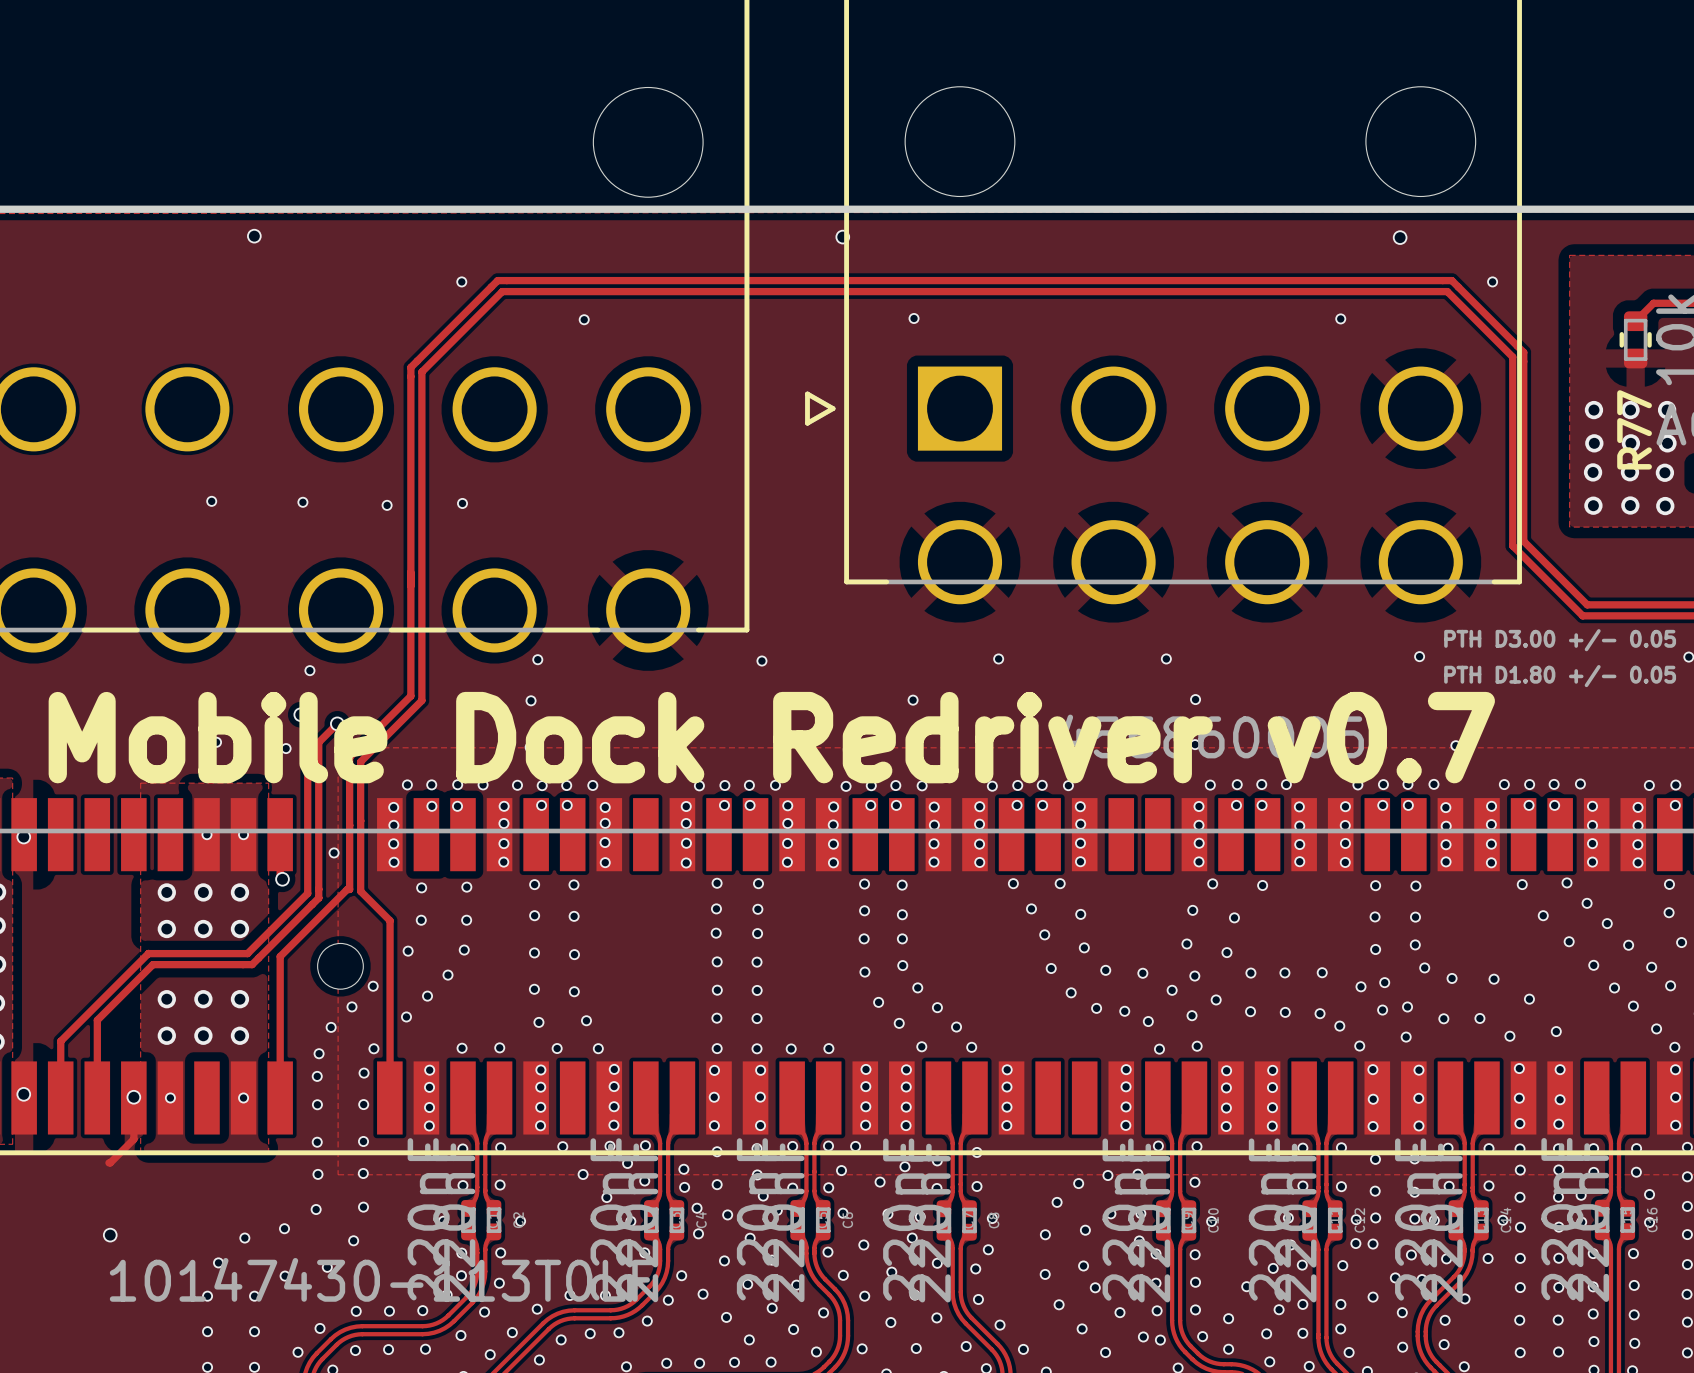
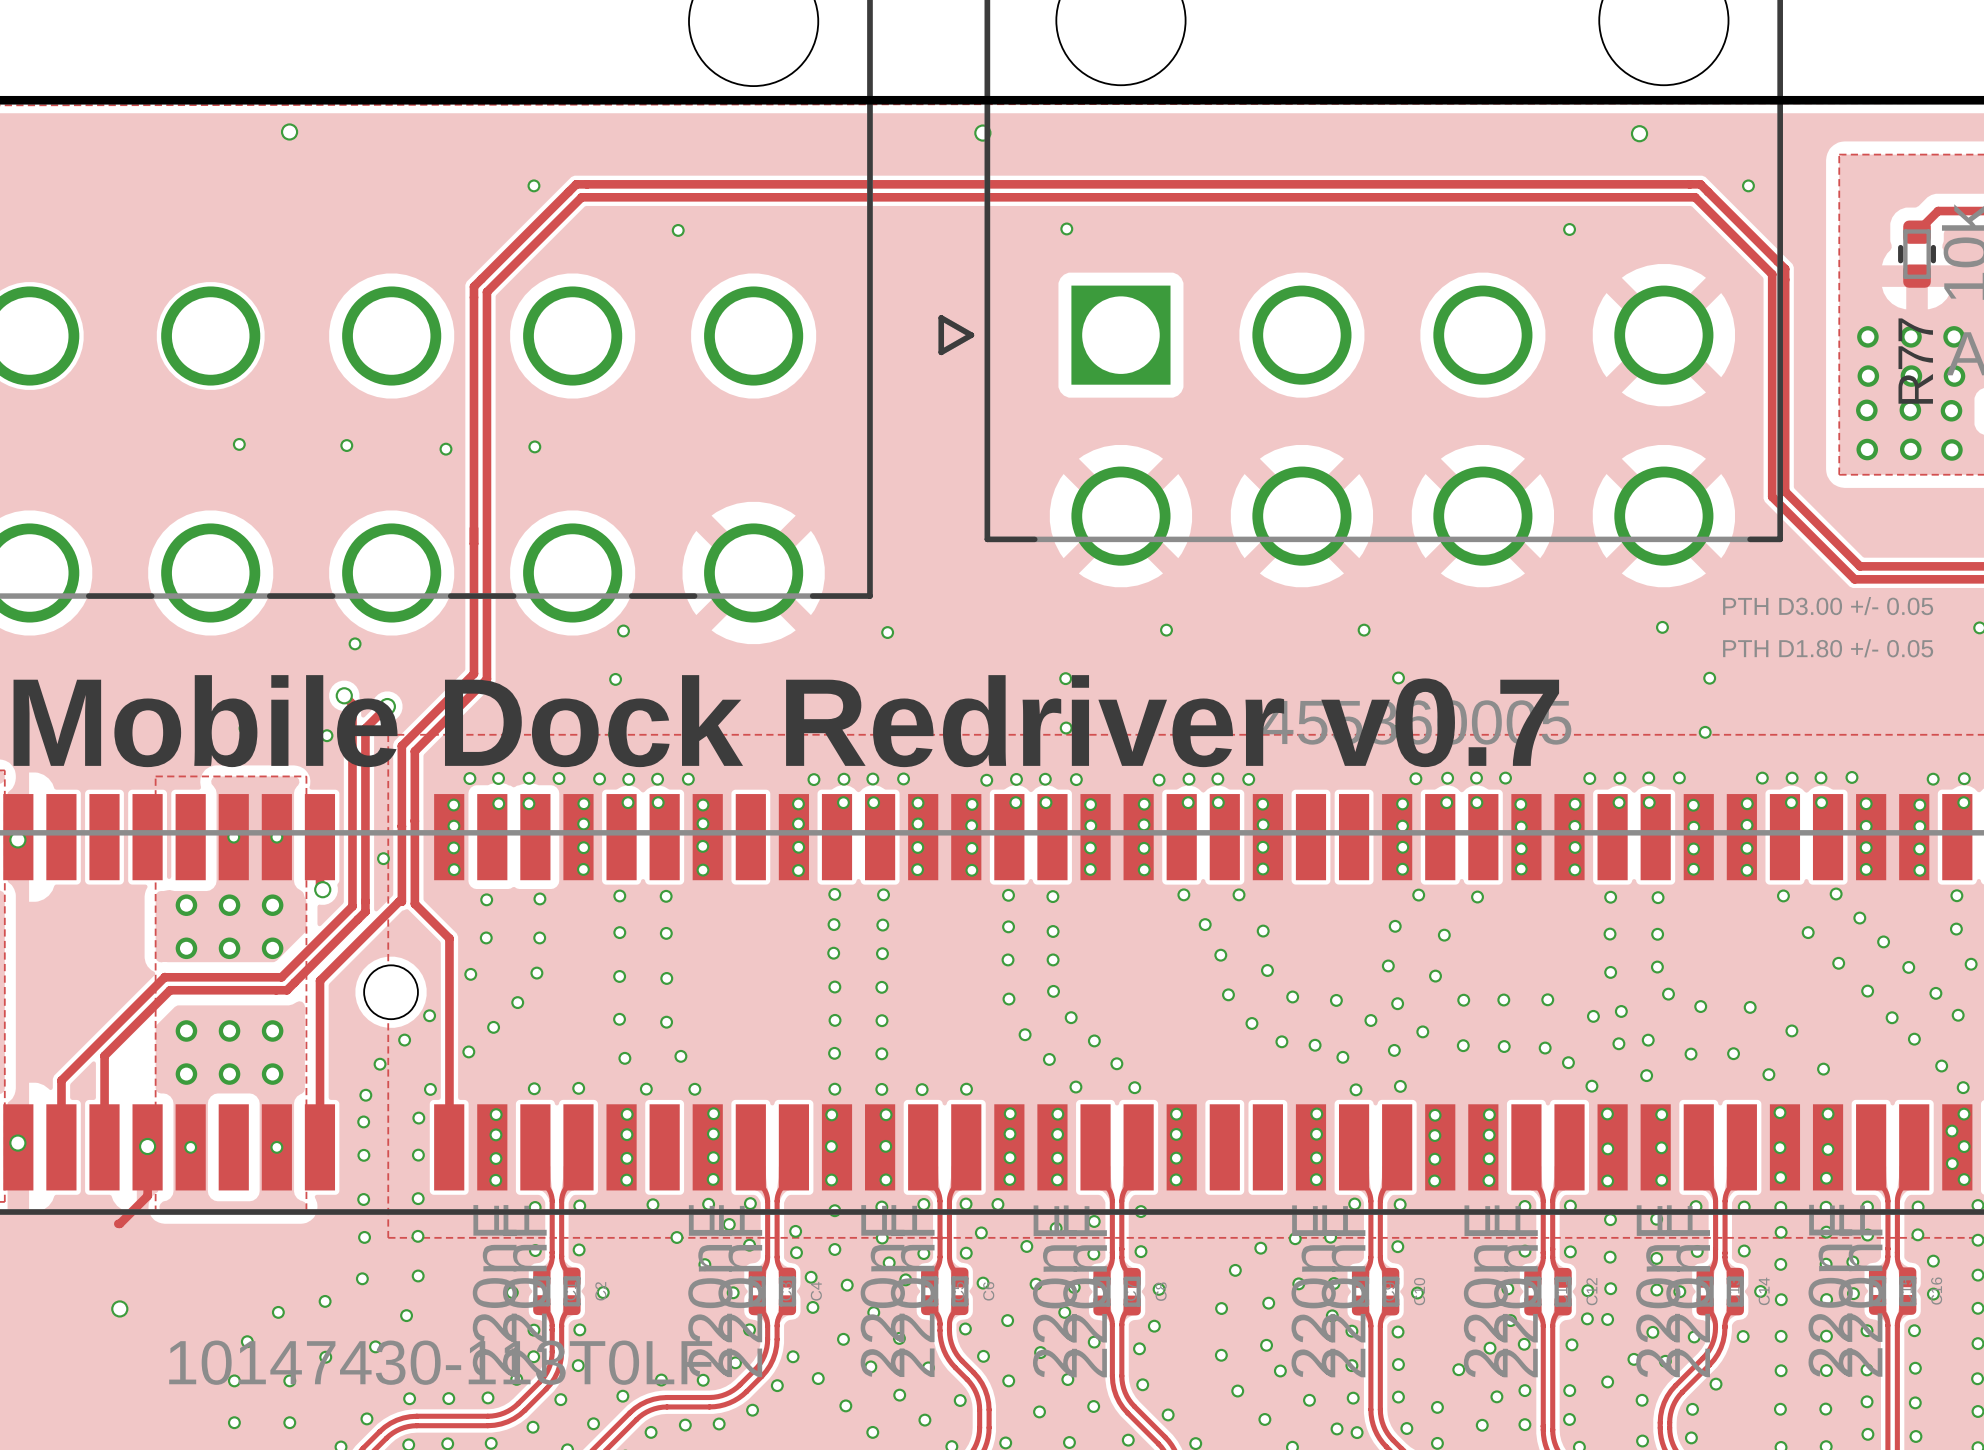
via: none -> (1951, 1131)
via: none -> (1952, 1163)

